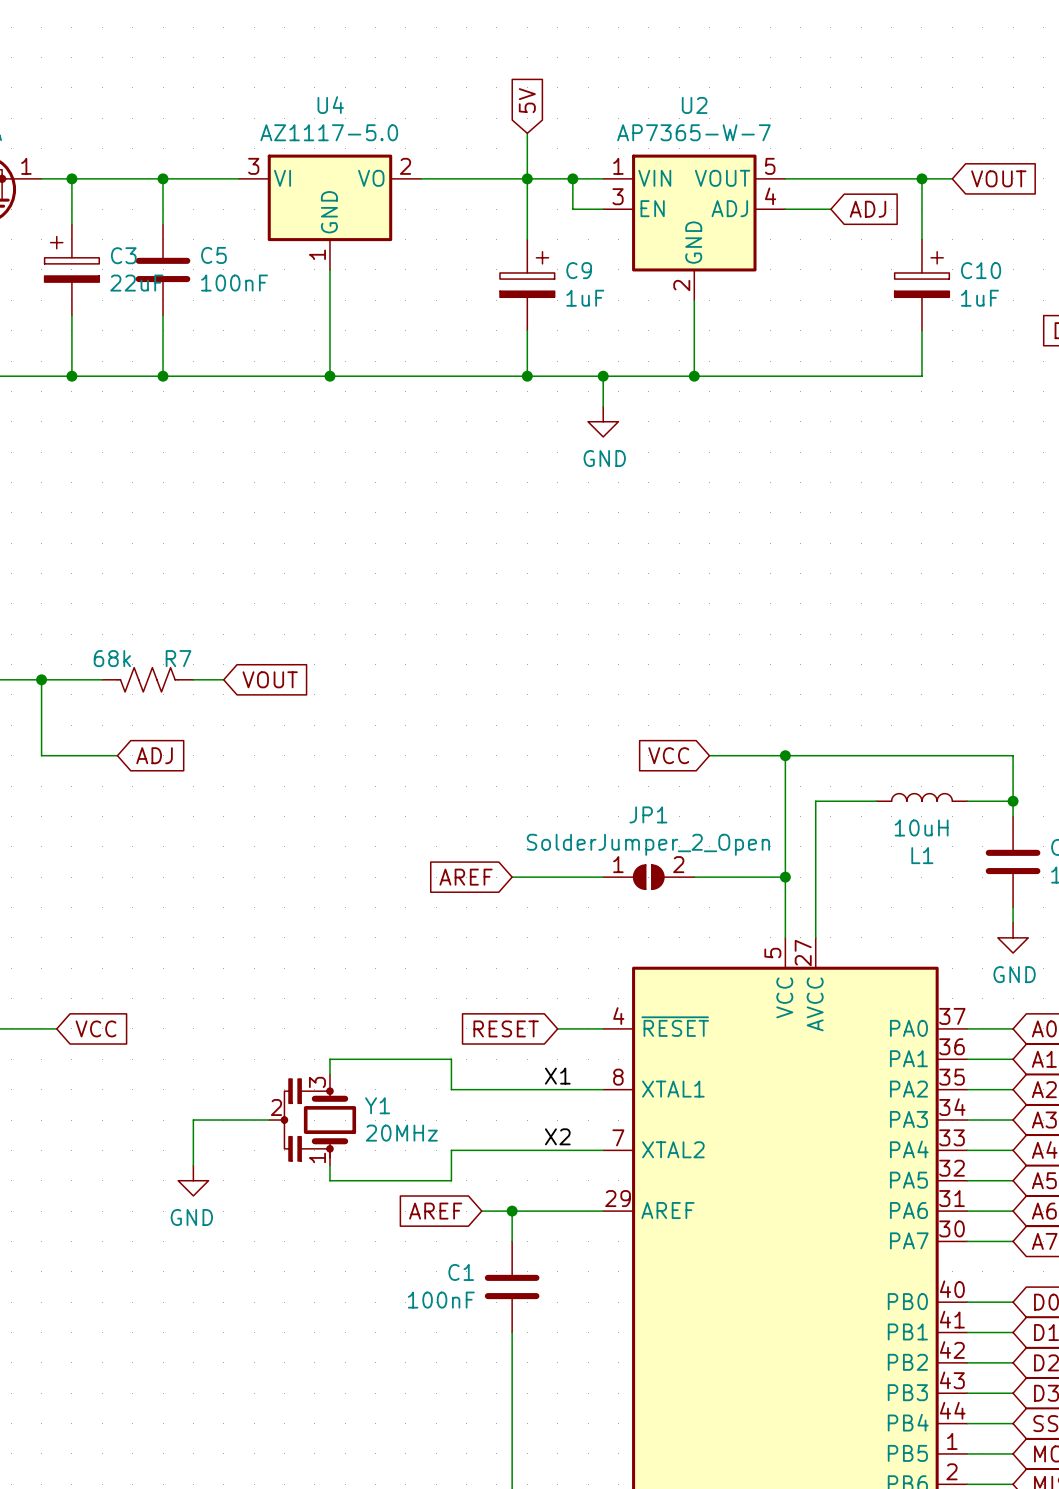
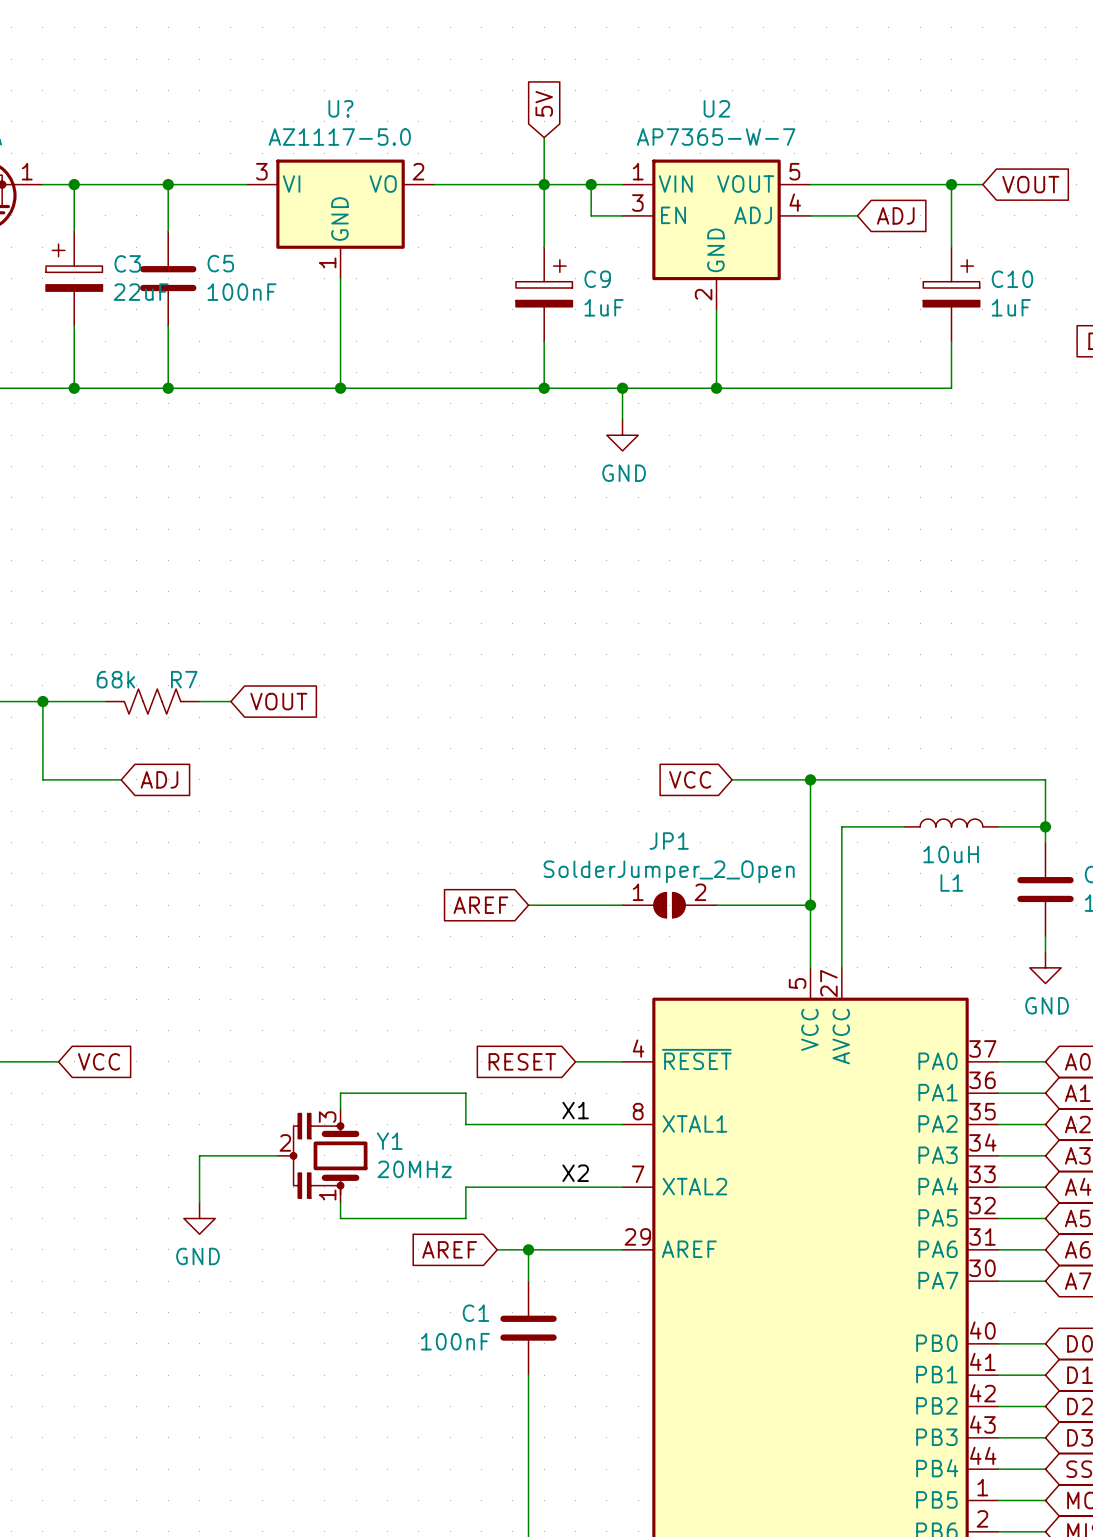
U4 name: U4 (330, 105) -> U? (340, 108)

